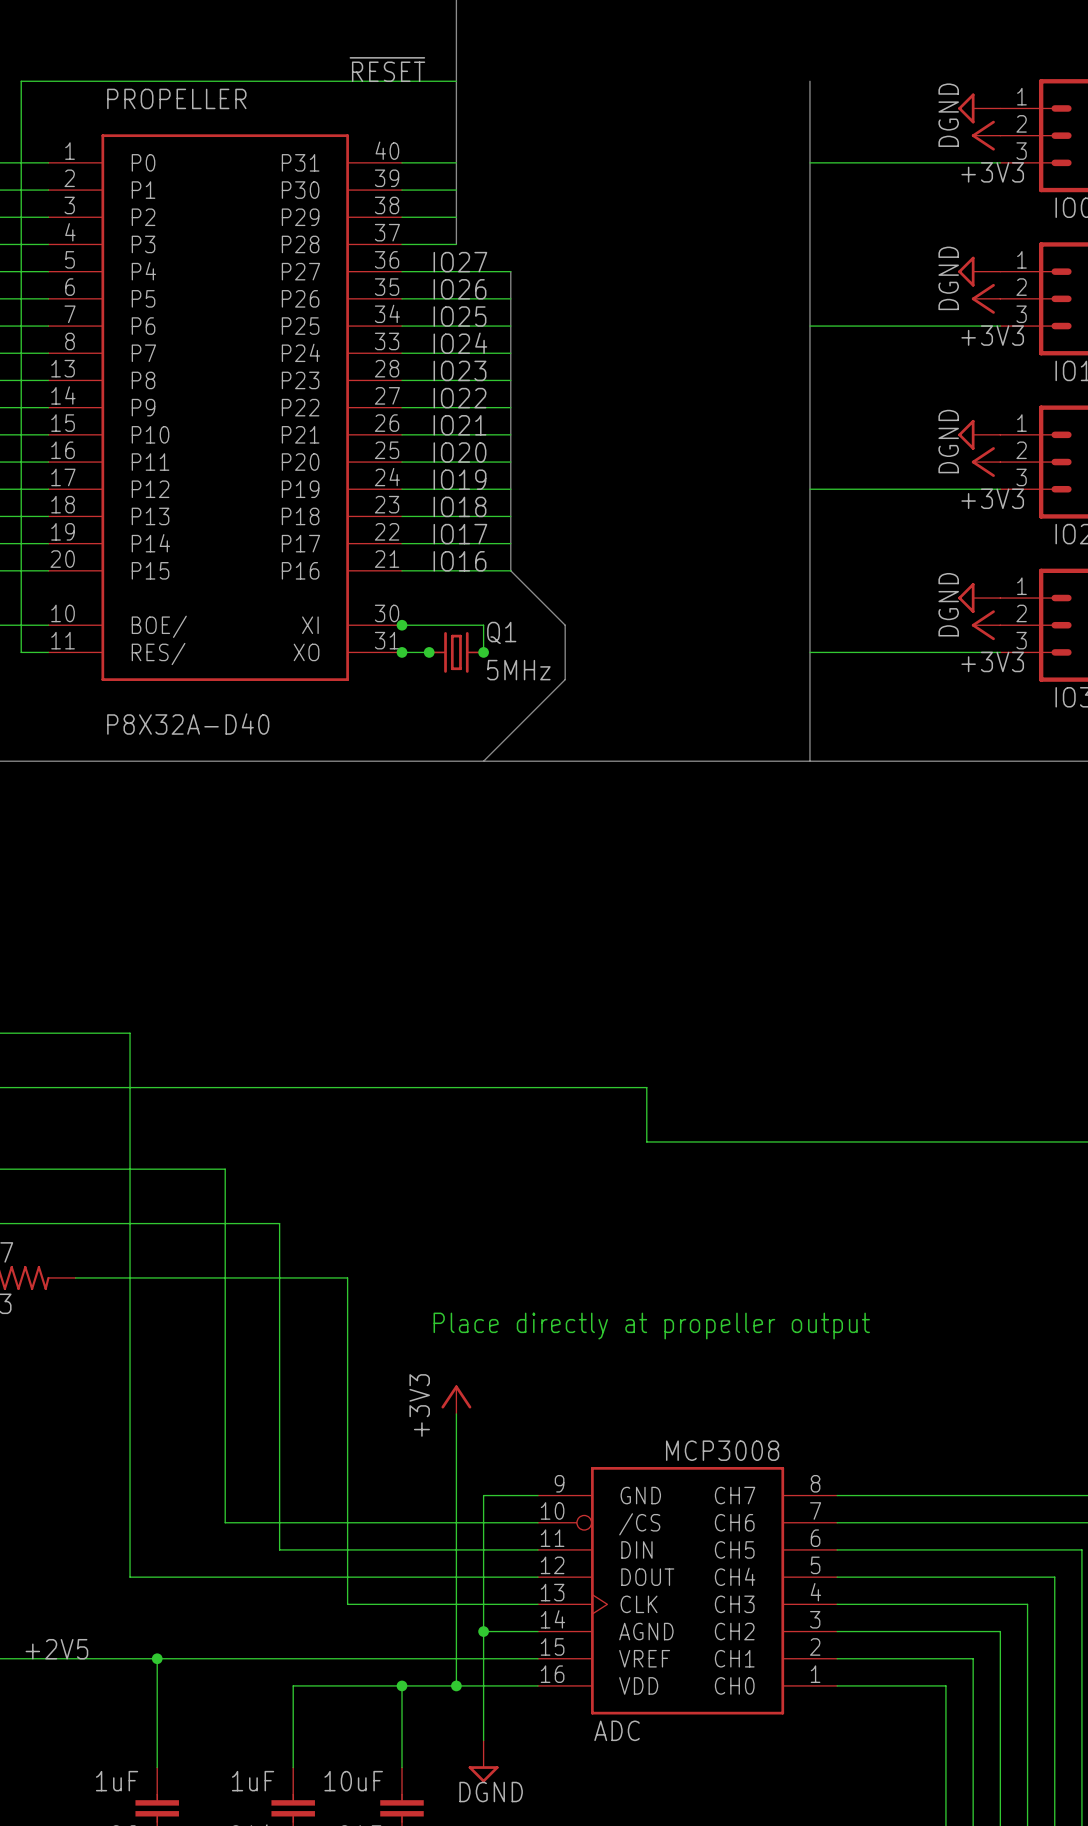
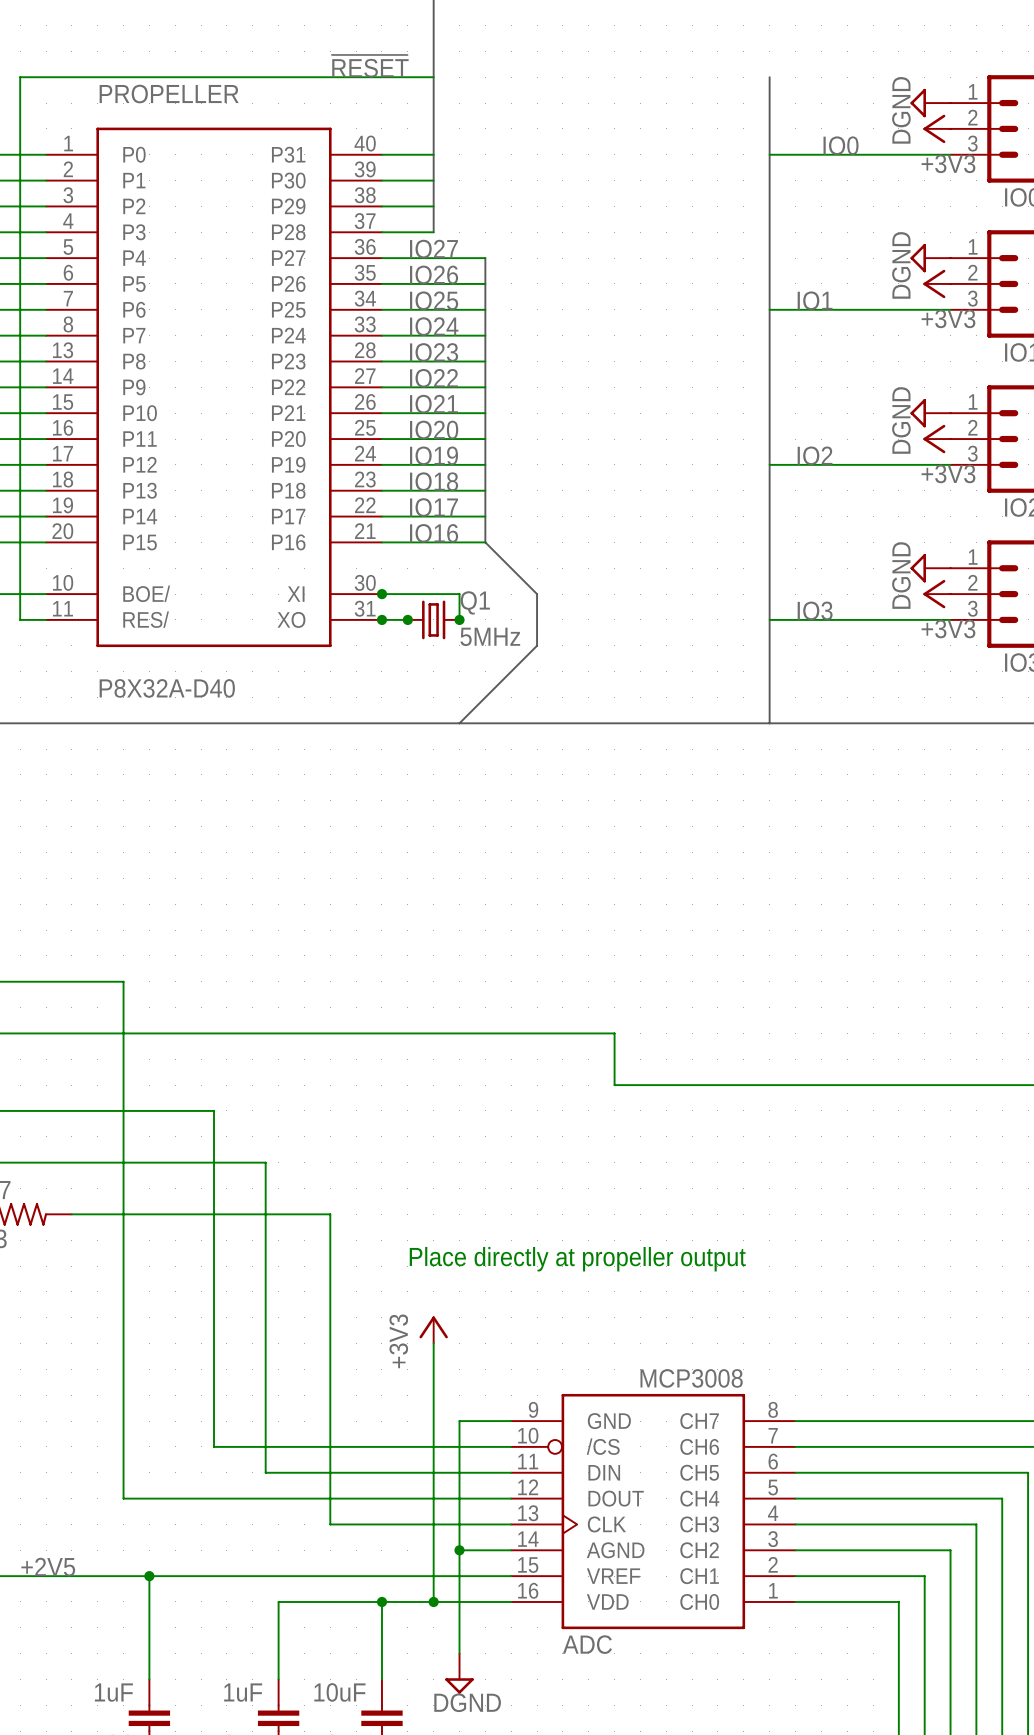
label: none -> IO0 (841, 145)
label: none -> IO1 (815, 300)
label: none -> IO2 (815, 455)
label: none -> IO3 (815, 610)

